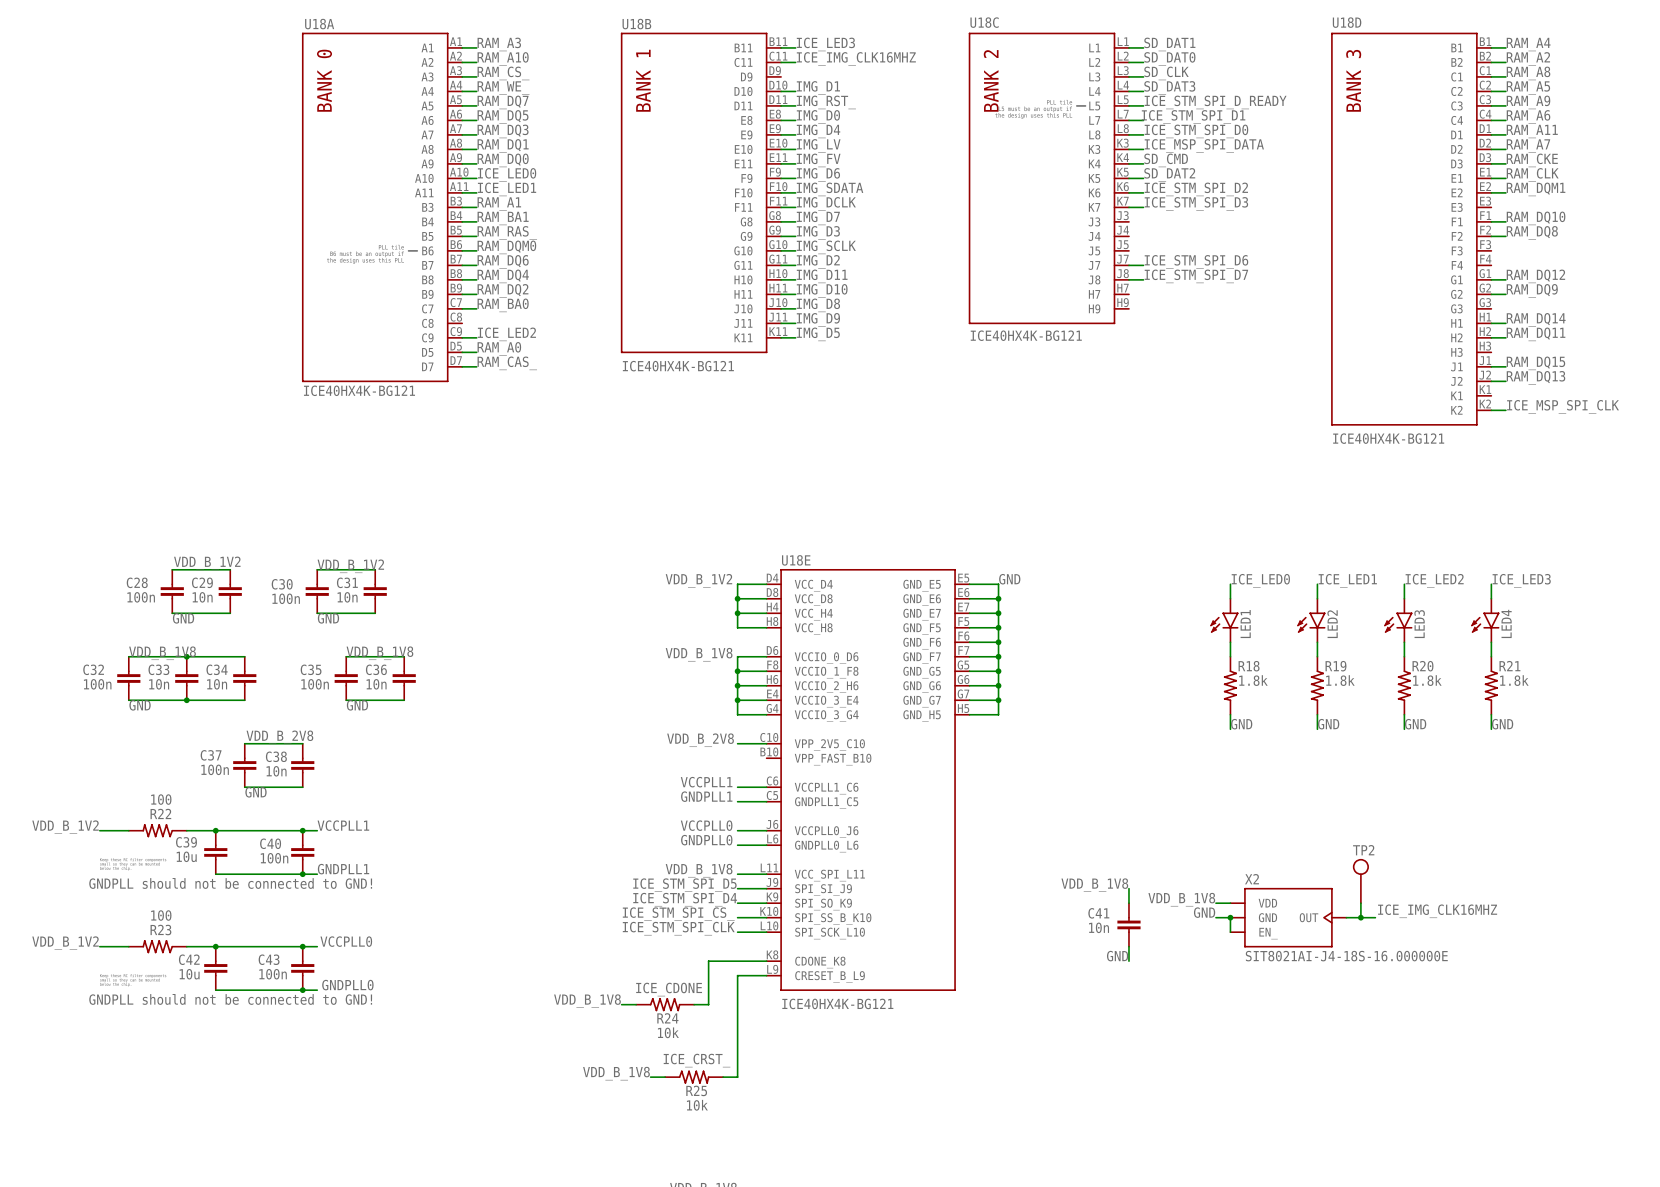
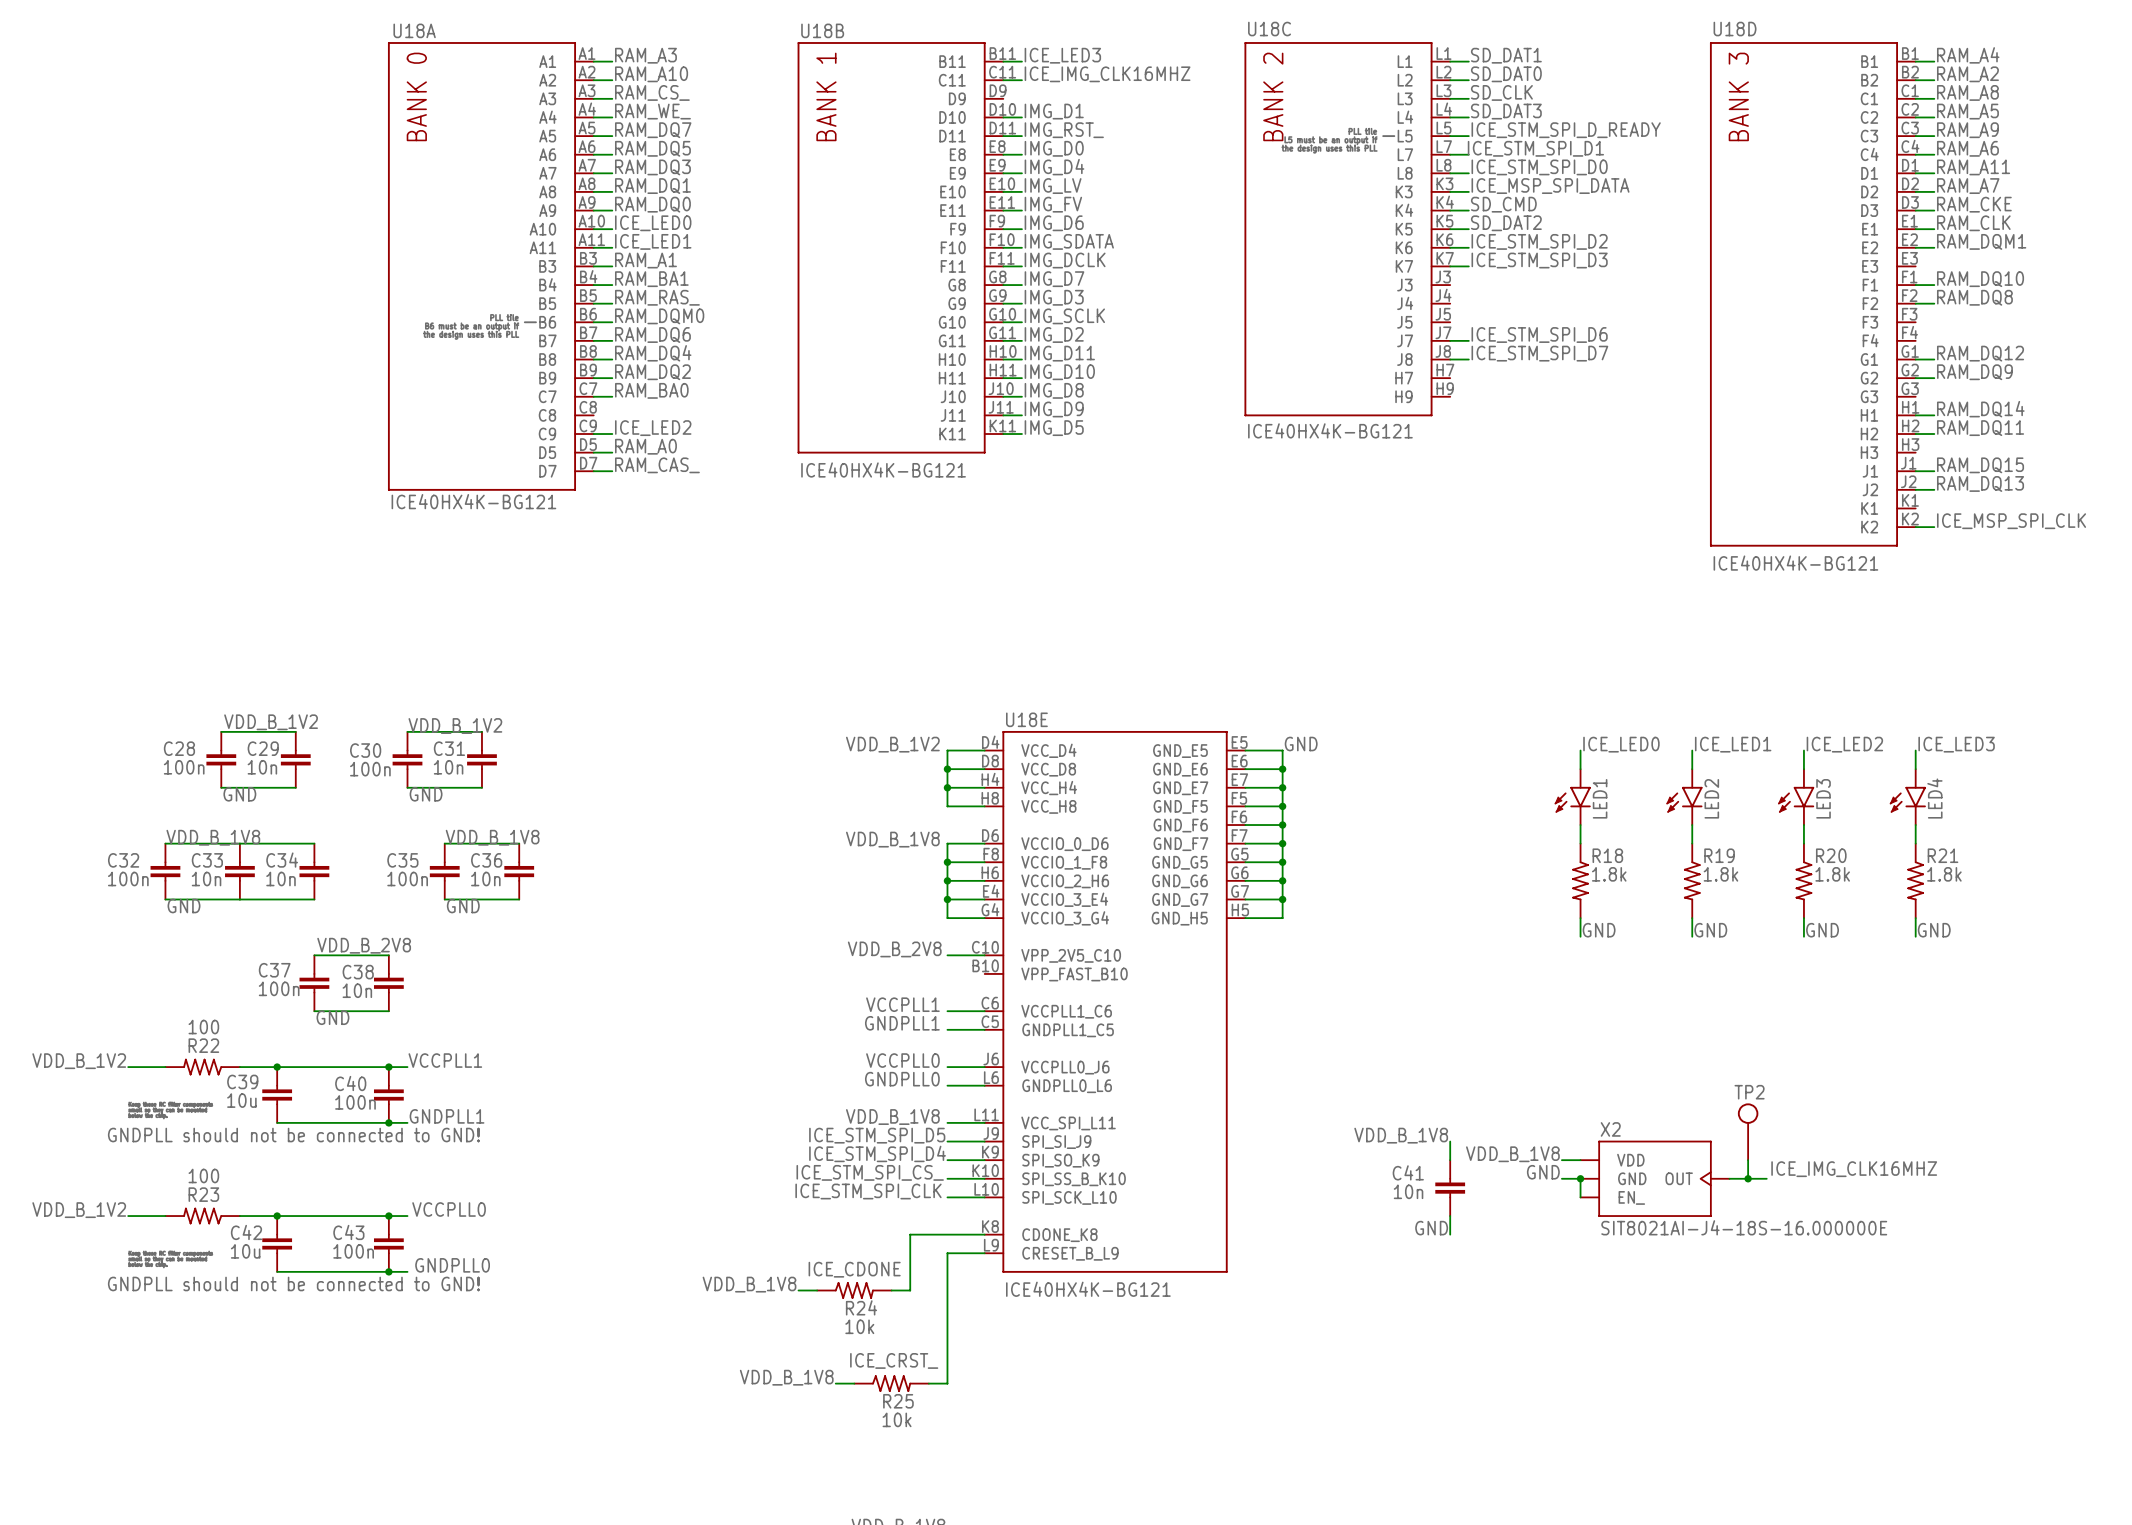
junction: (186, 656) -> none
junction: (186, 700) -> none

